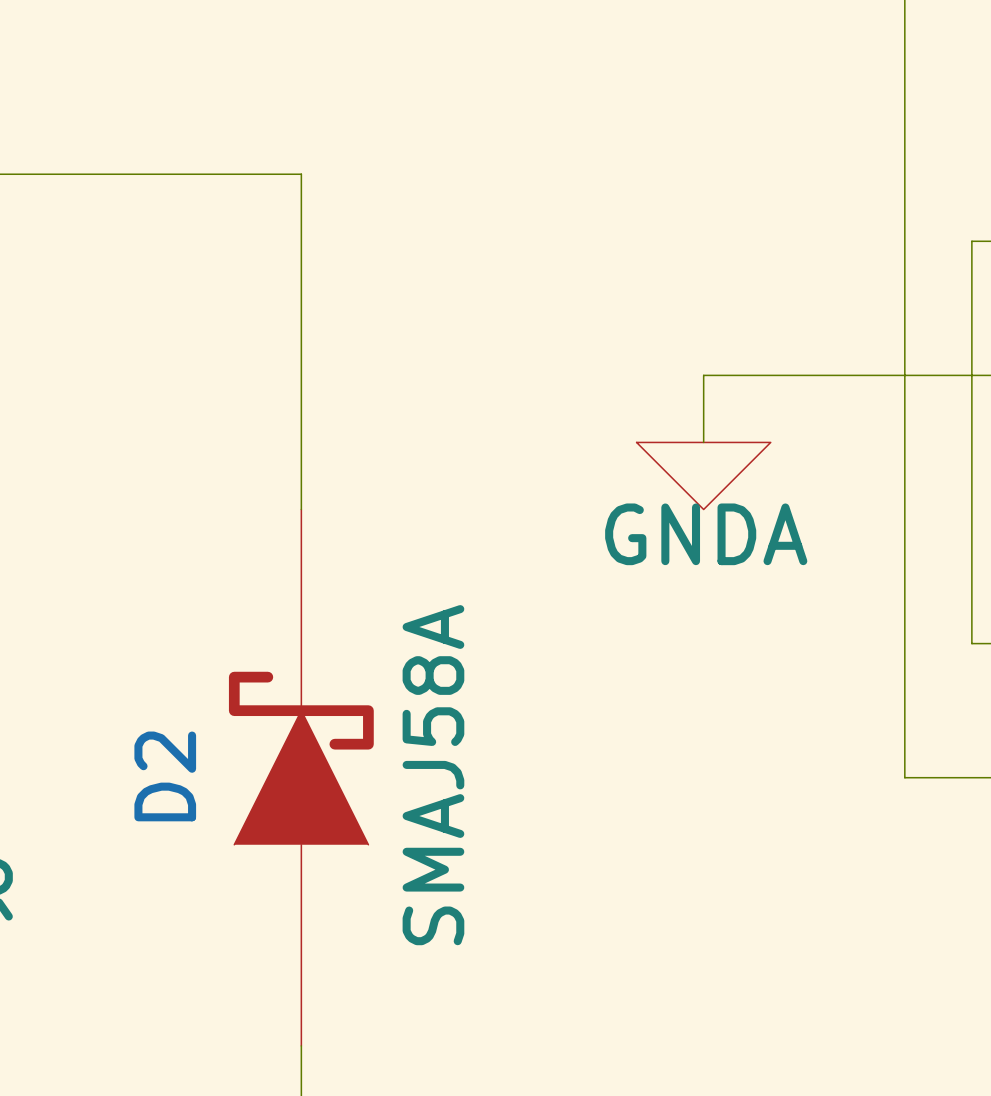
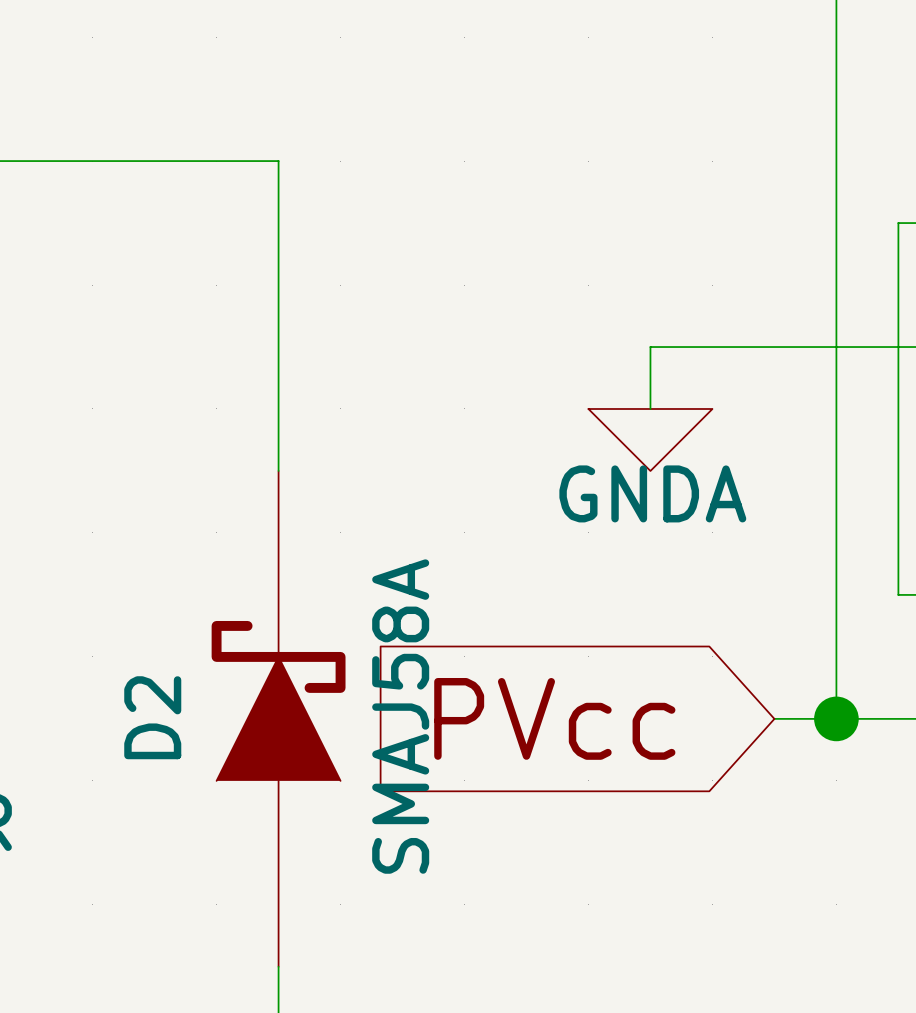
global label: none -> PVcc (554, 718)
wire: none -> (774, 718) (836, 718)
junction: none -> (836, 718)

